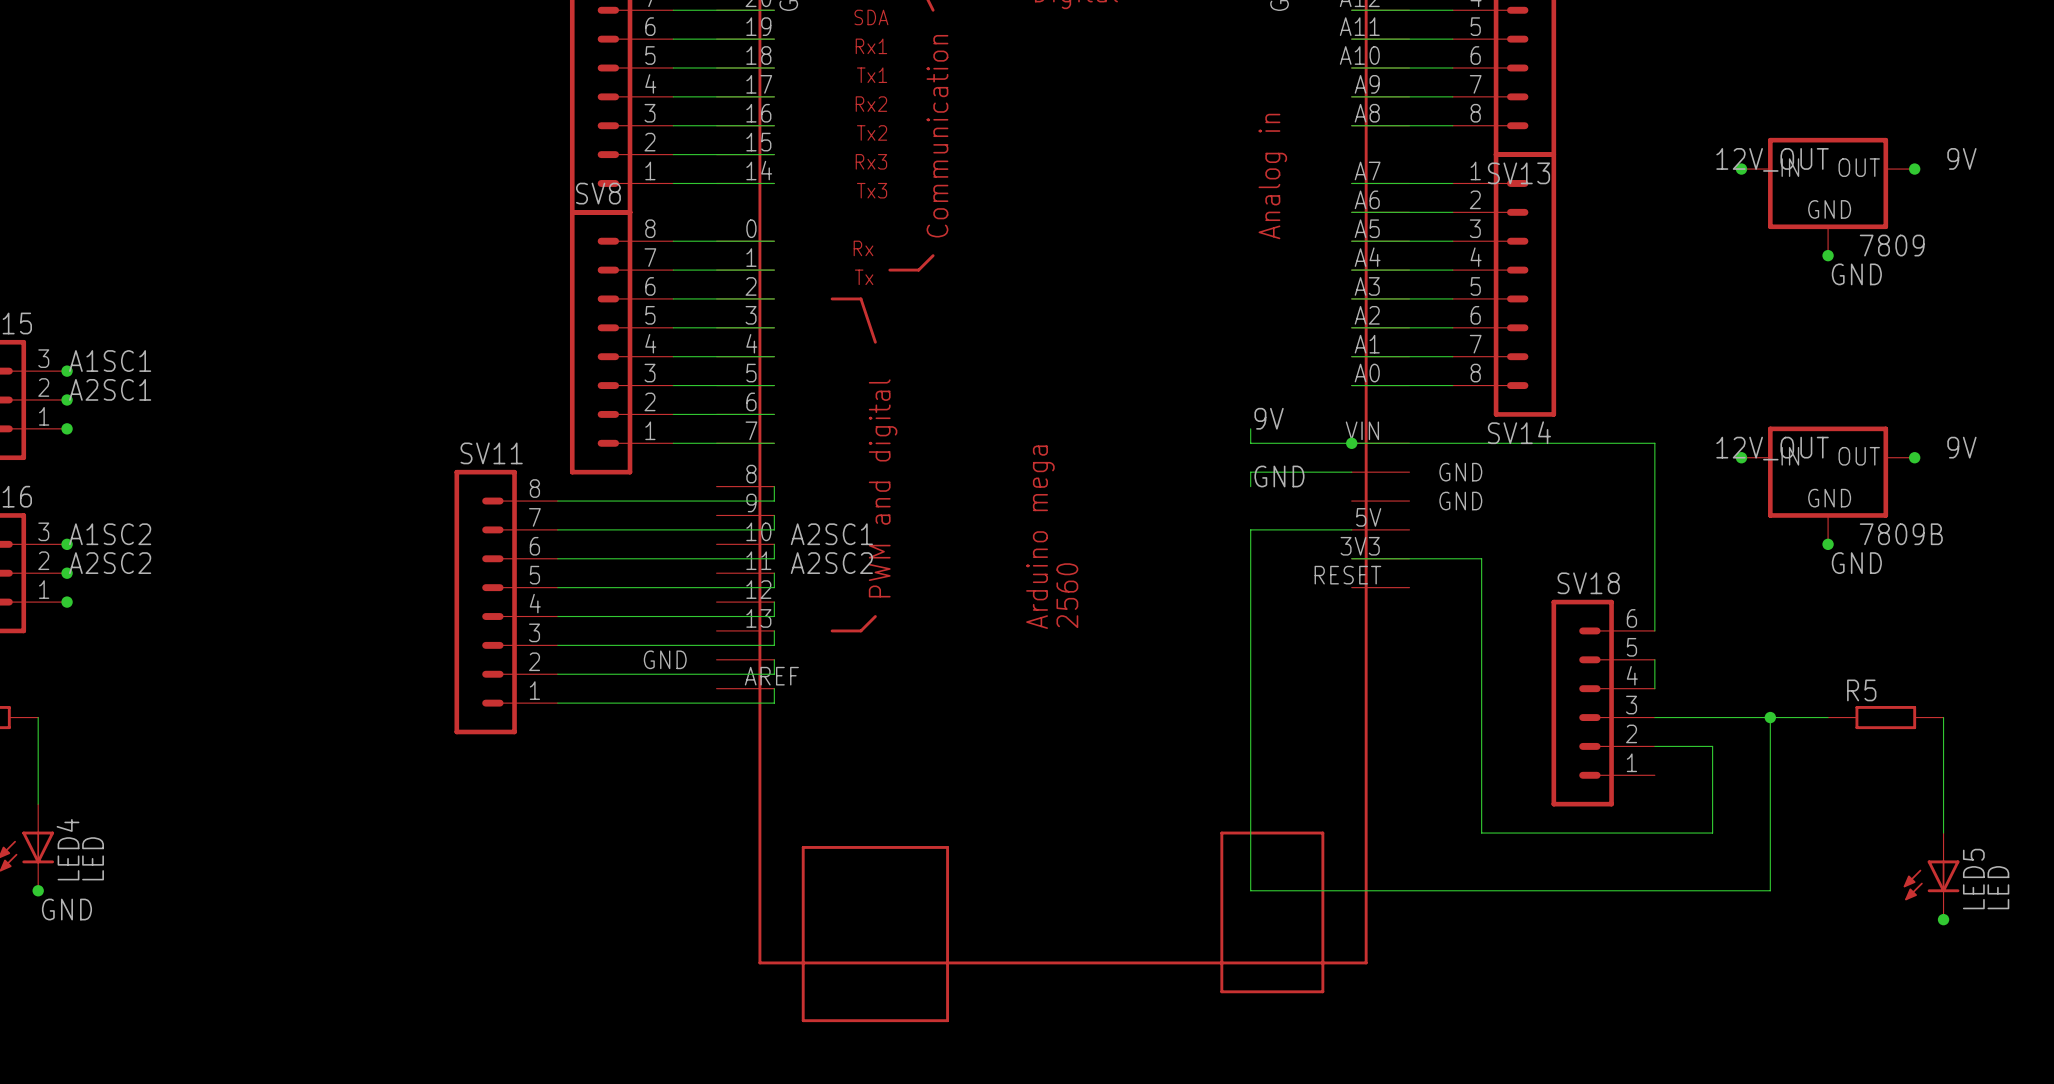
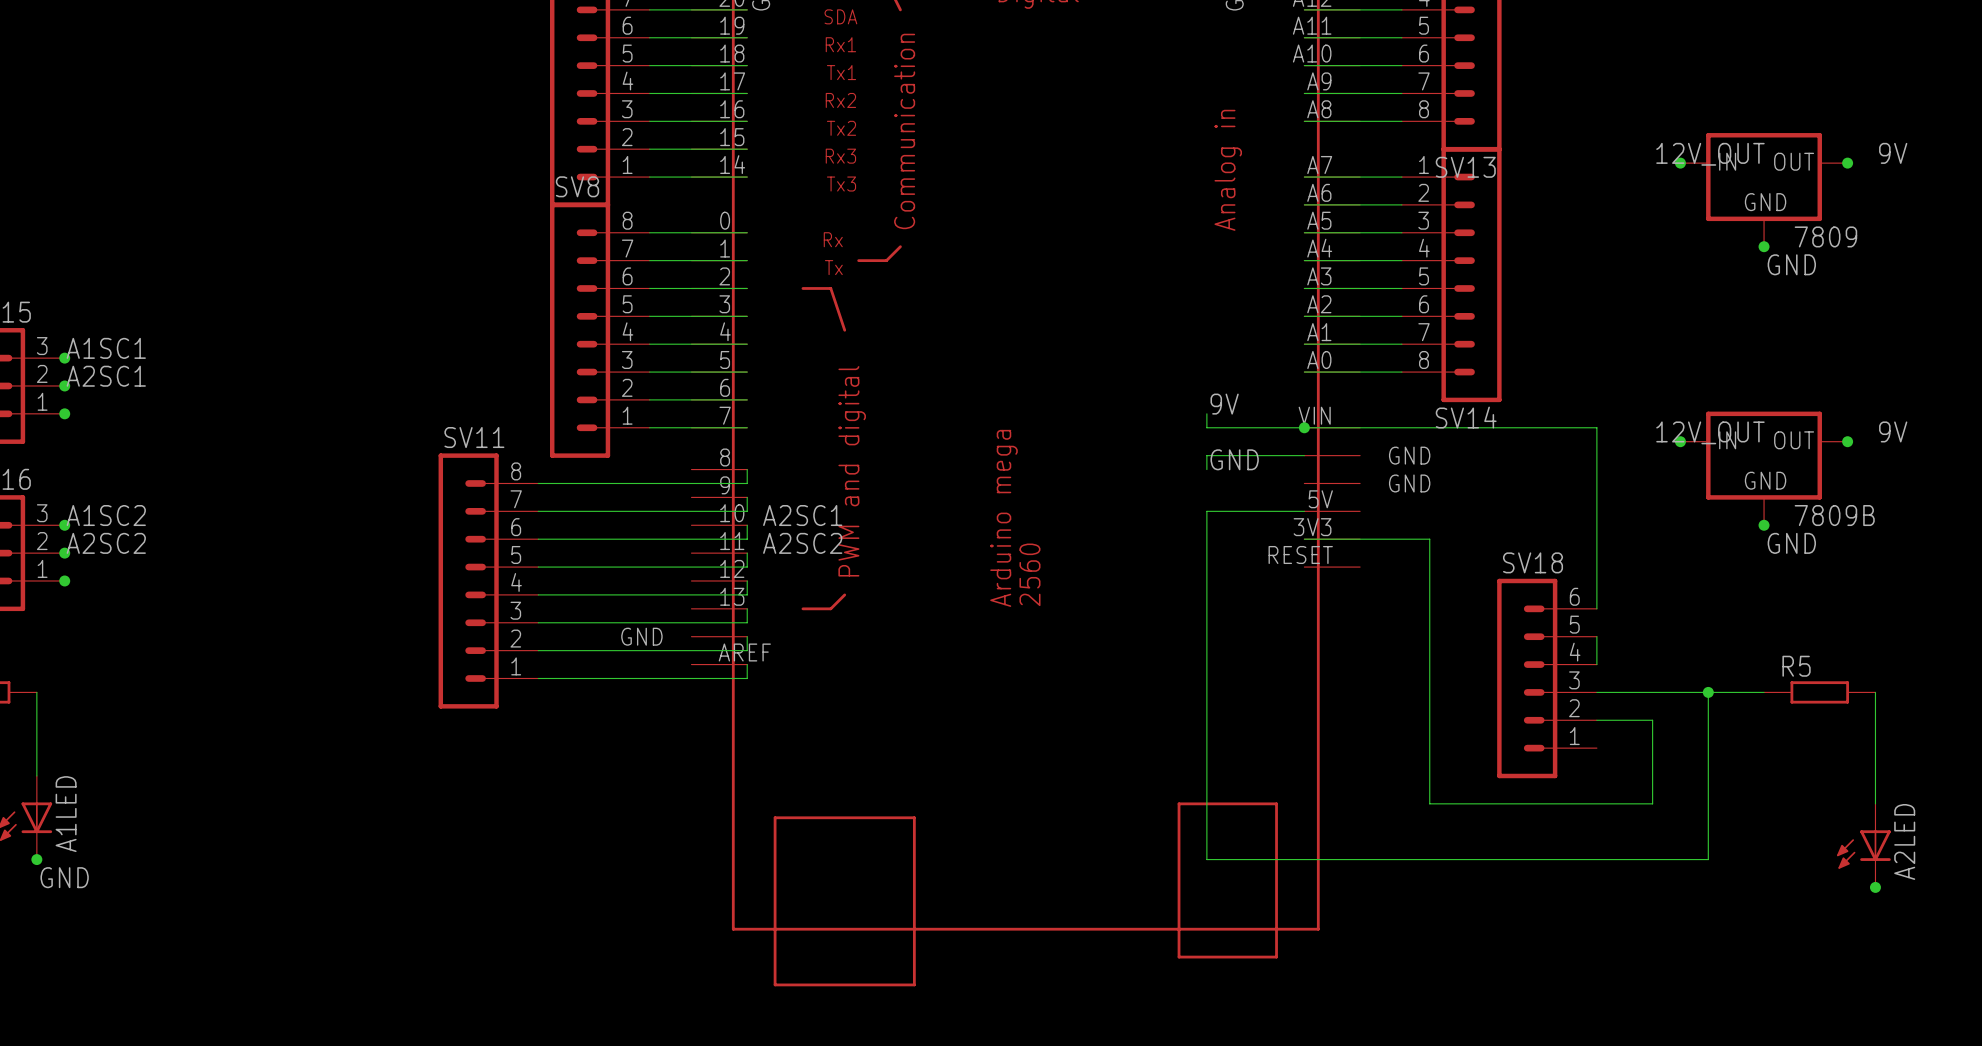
LED4 name: LED4 (68, 849) -> A1LED (66, 814)
LED4 value: LED (93, 858) -> none
LED5 name: LED5 (1973, 879) -> A2LED (1904, 841)
LED5 value: LED (1998, 887) -> none

